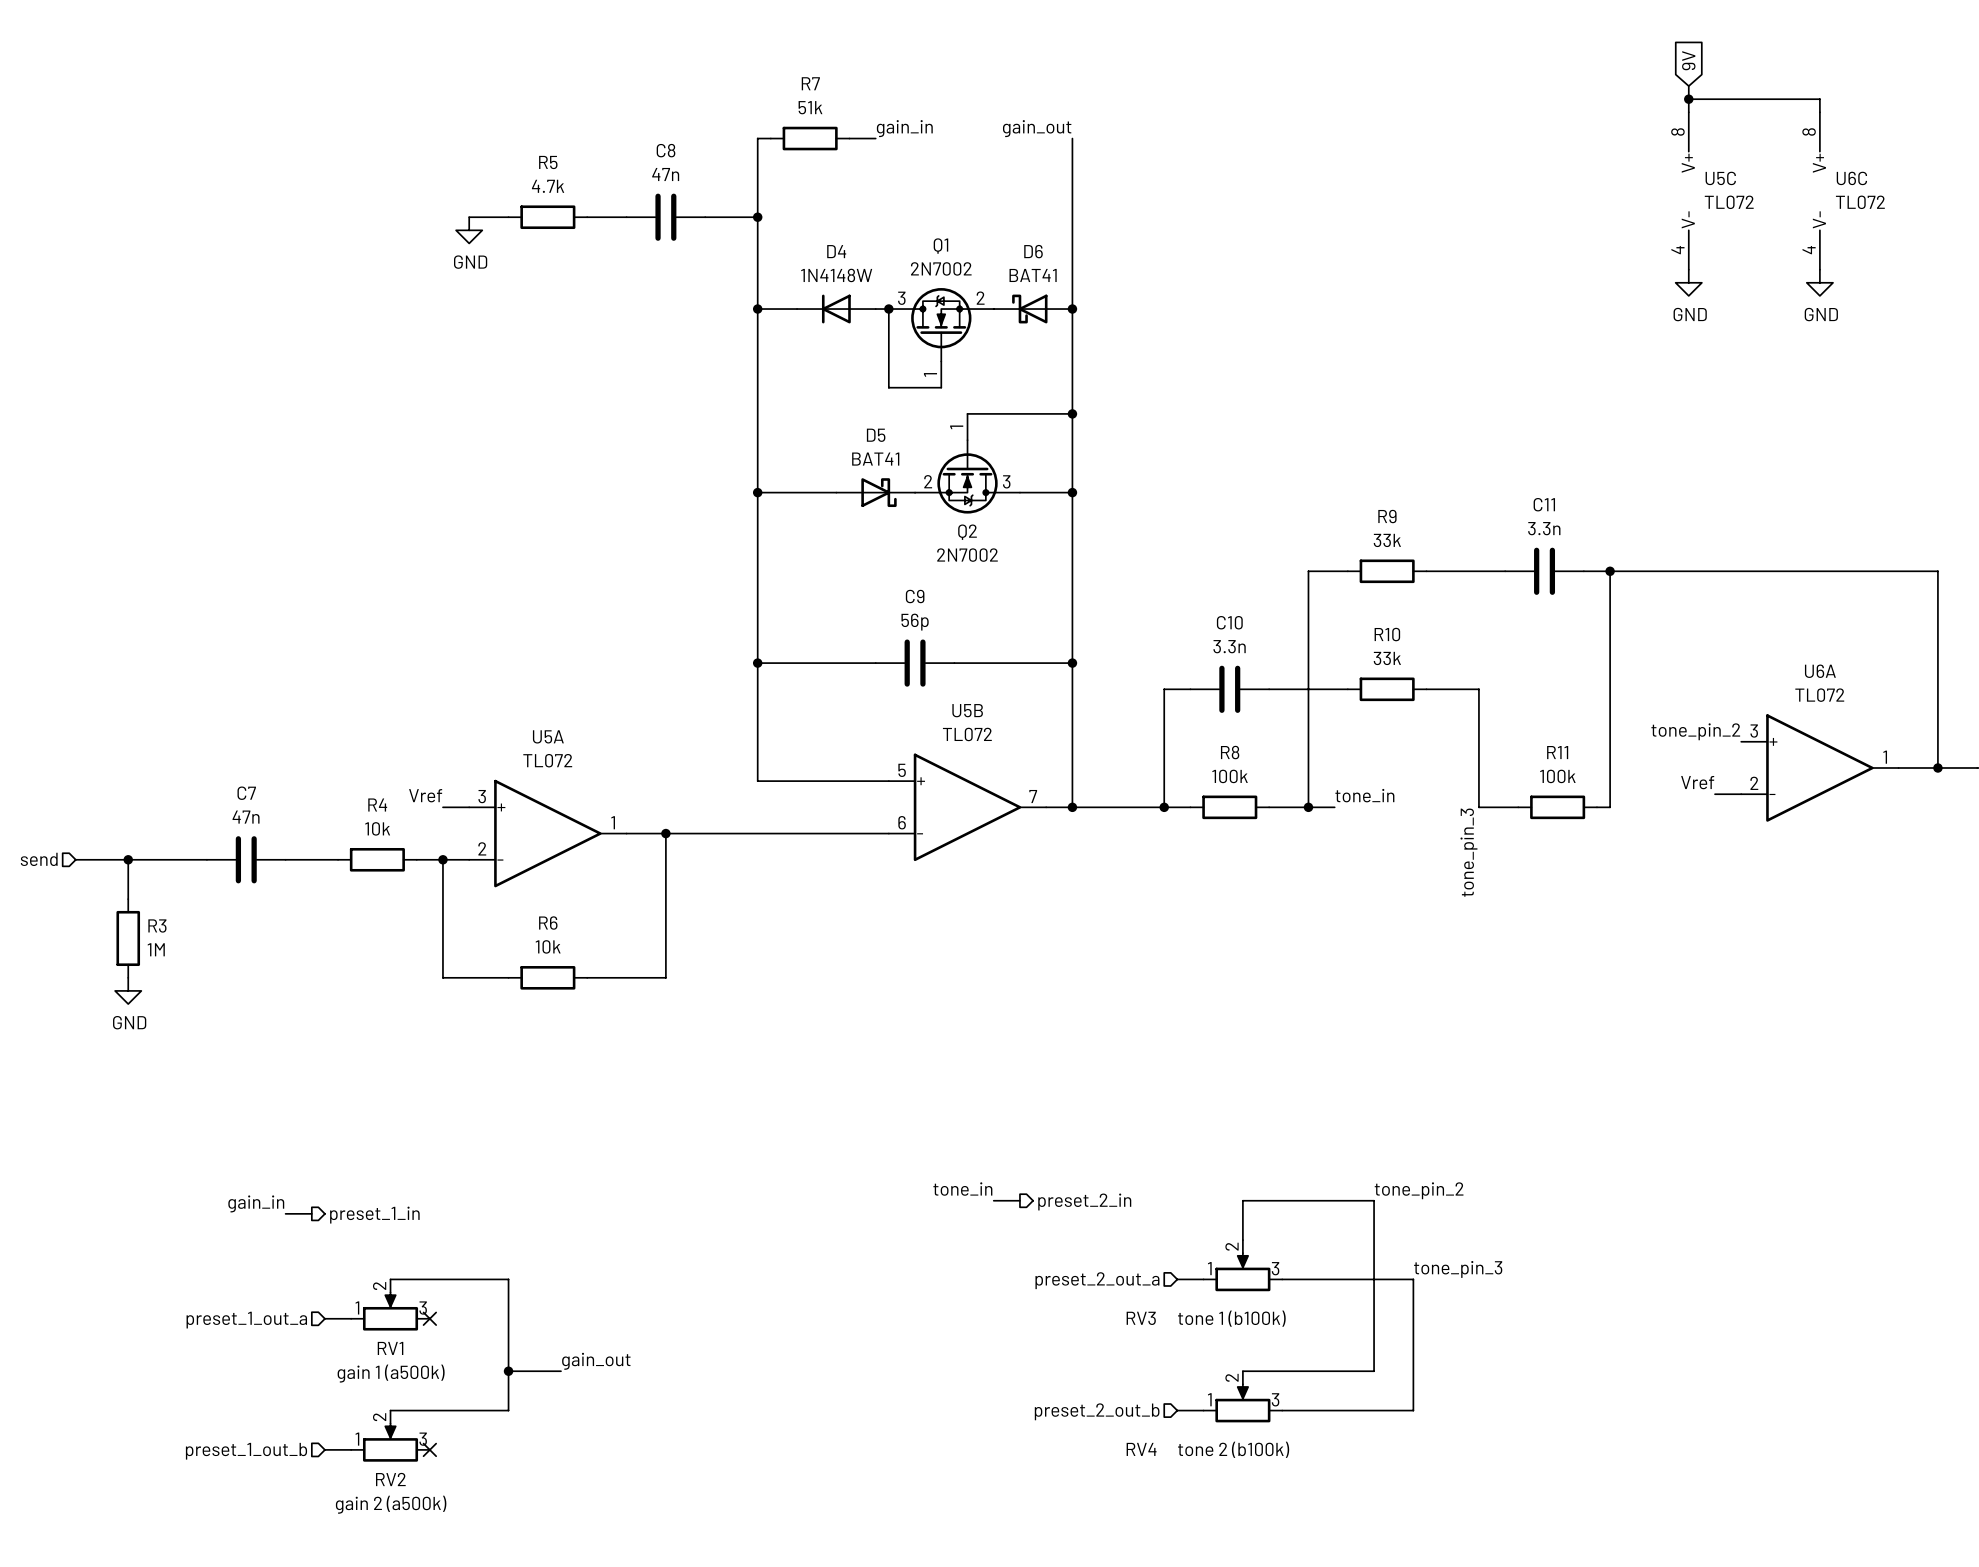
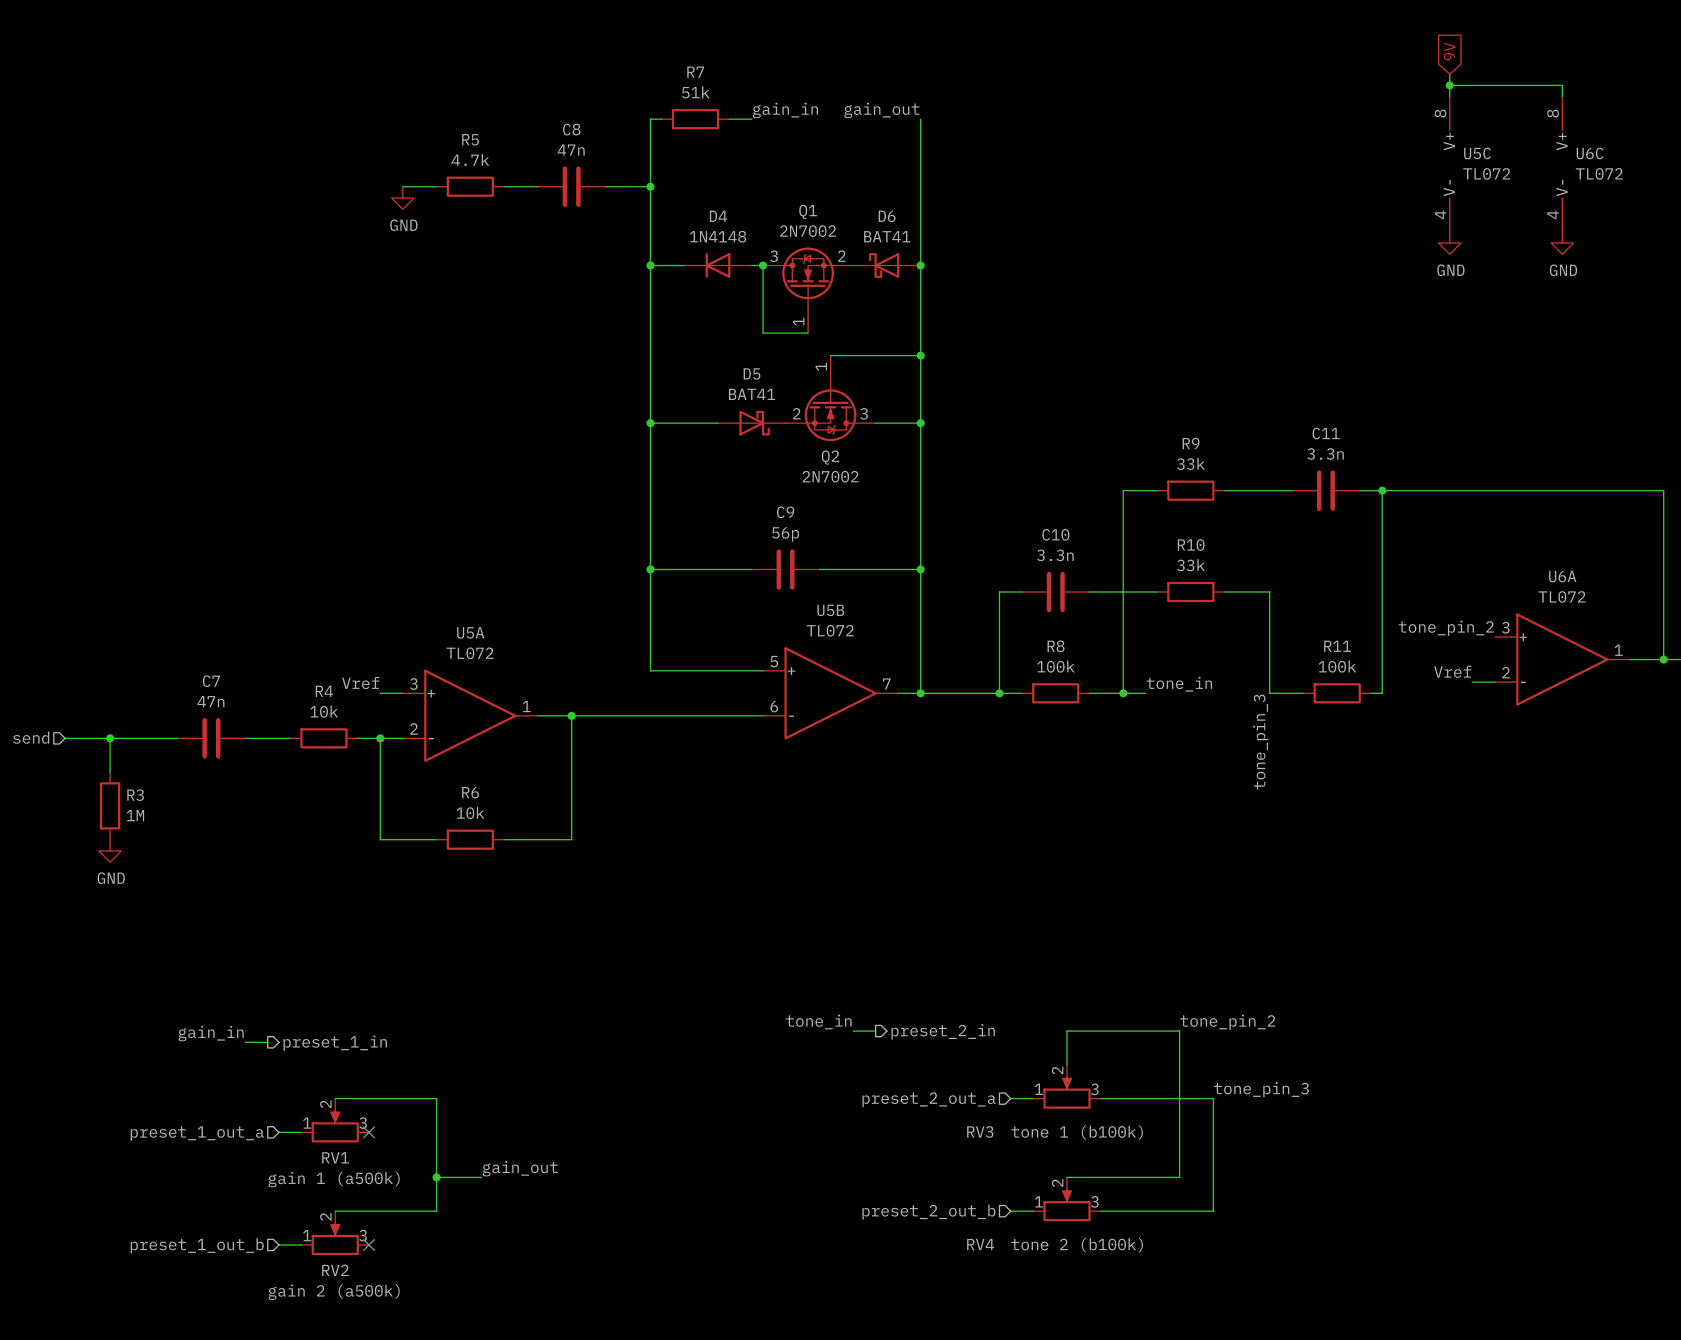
D4 value: 1N4148W (836, 275) -> 1N4148 (718, 236)

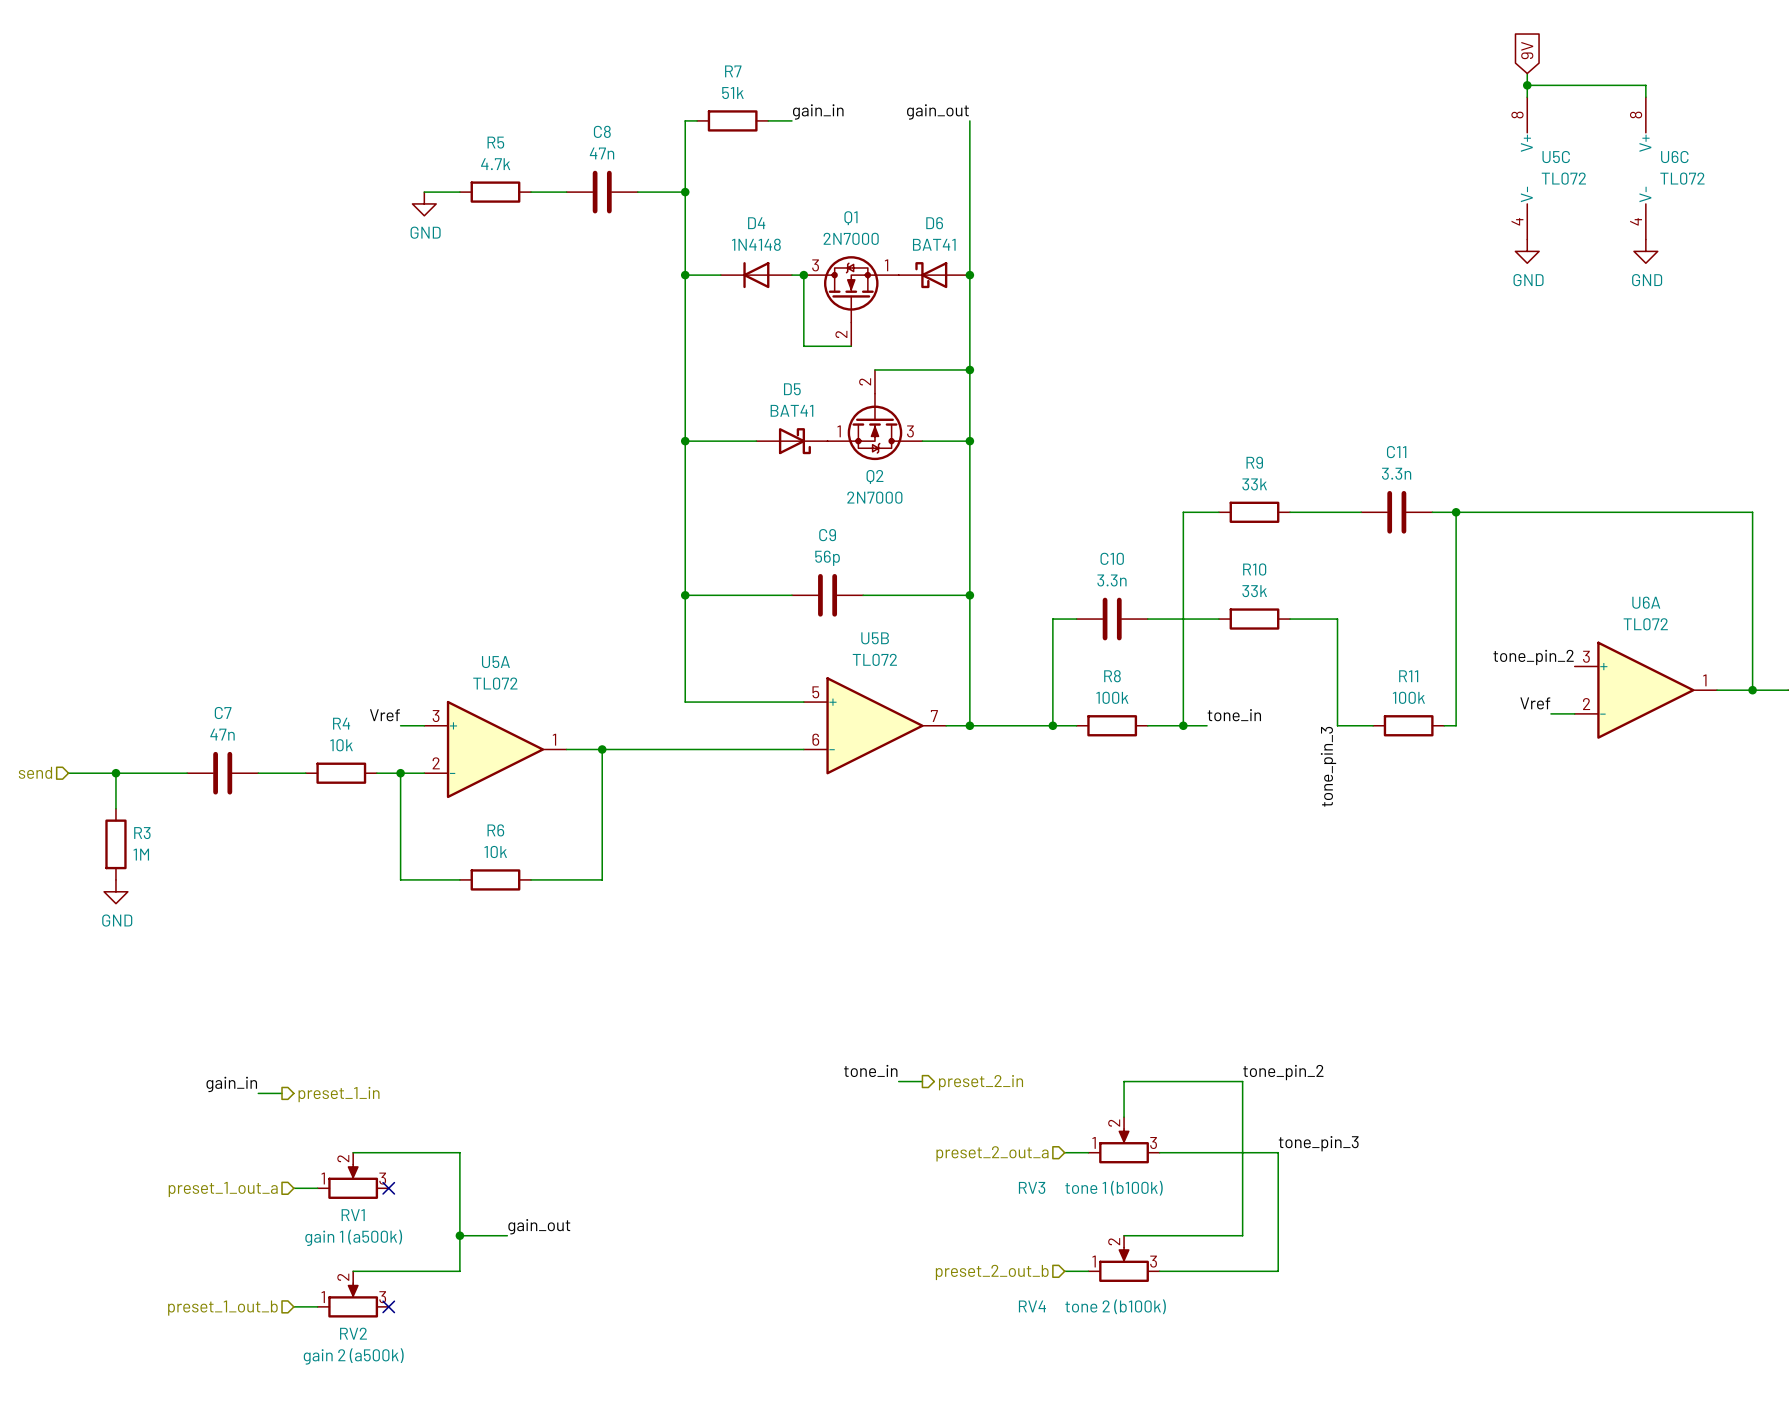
Q1 value: 2N7002 (808, 231) -> 2N7000 (851, 238)
Q1 pin number: 2 (841, 256) -> 1 (886, 265)
Q1 pin number: 1 (798, 321) -> 2 (841, 334)
Q2 pin number: 1 (821, 366) -> 2 (865, 381)
Q2 pin number: 2 (796, 413) -> 1 (839, 431)
Q2 value: 2N7002 (830, 476) -> 2N7000 (874, 497)

